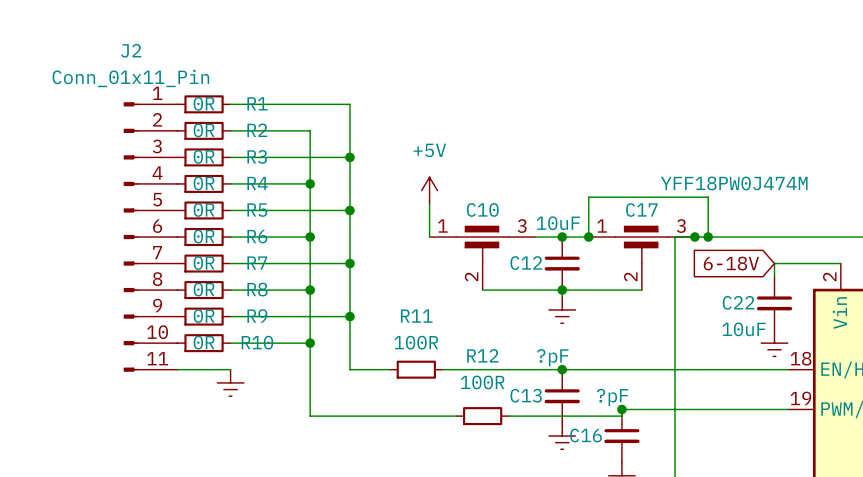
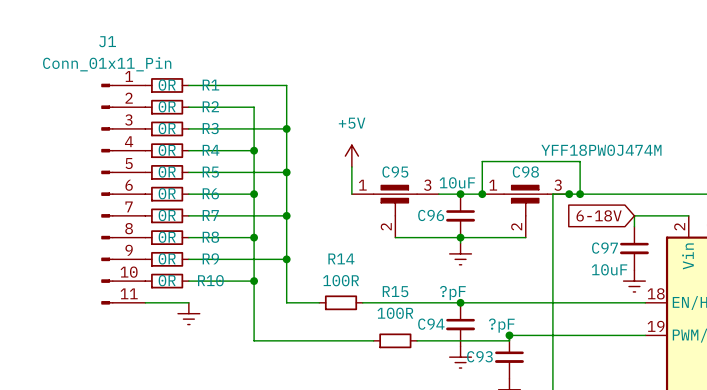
J2 name: J2 (131, 50) -> J1 (107, 41)
C10 name: C10 (482, 209) -> C95 (395, 172)
C17 name: C17 (641, 209) -> C98 (525, 172)
C12 name: C12 (526, 263) -> C96 (431, 215)
C22 name: C22 (738, 302) -> C97 (604, 248)
R11 name: R11 (416, 316) -> R14 (341, 258)
R12 name: R12 (482, 355) -> R15 (395, 291)
C13 name: C13 (526, 395) -> C94 (431, 324)
C16 name: C16 (586, 435) -> C93 (479, 356)

